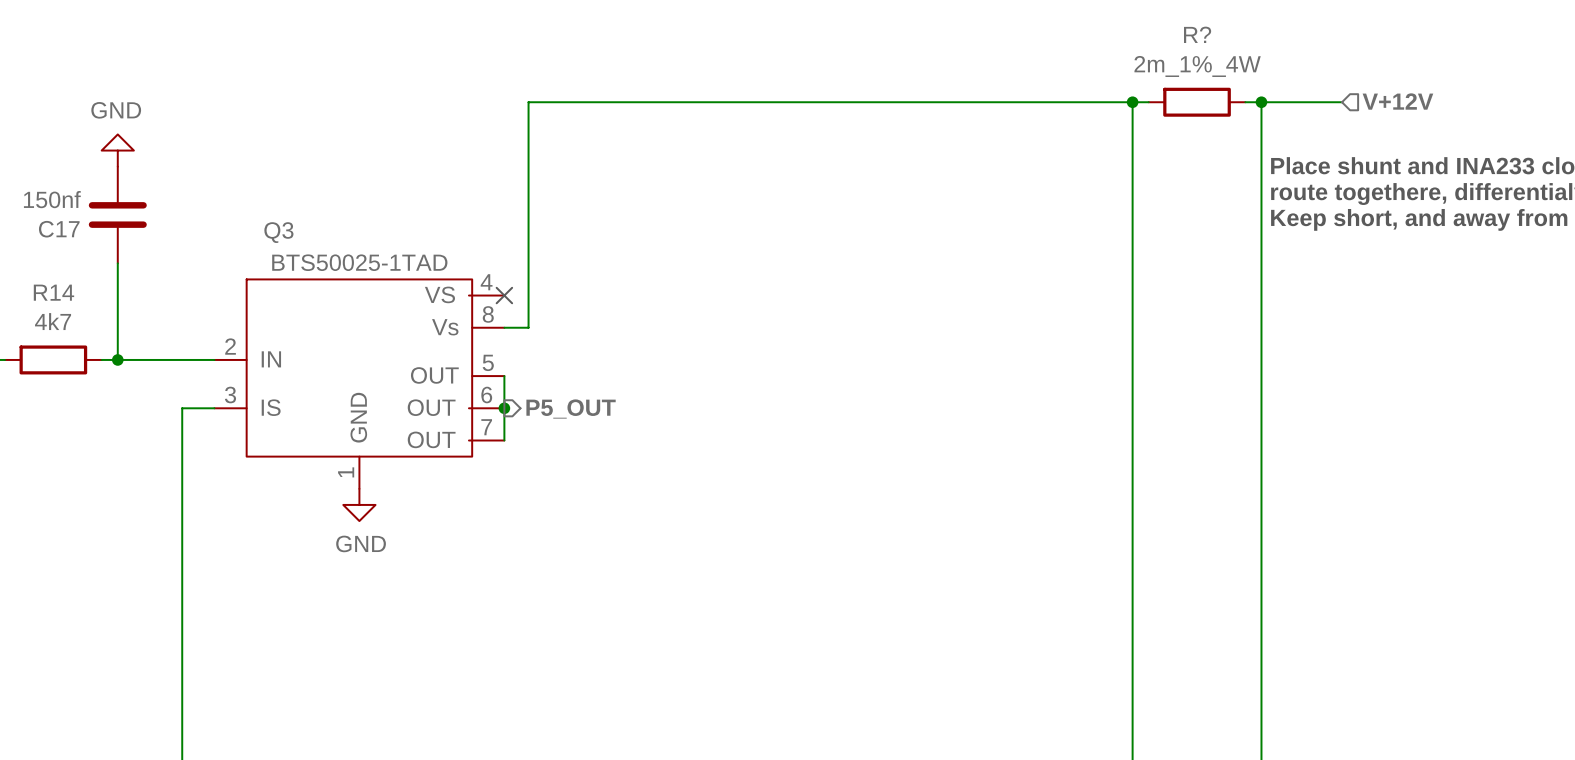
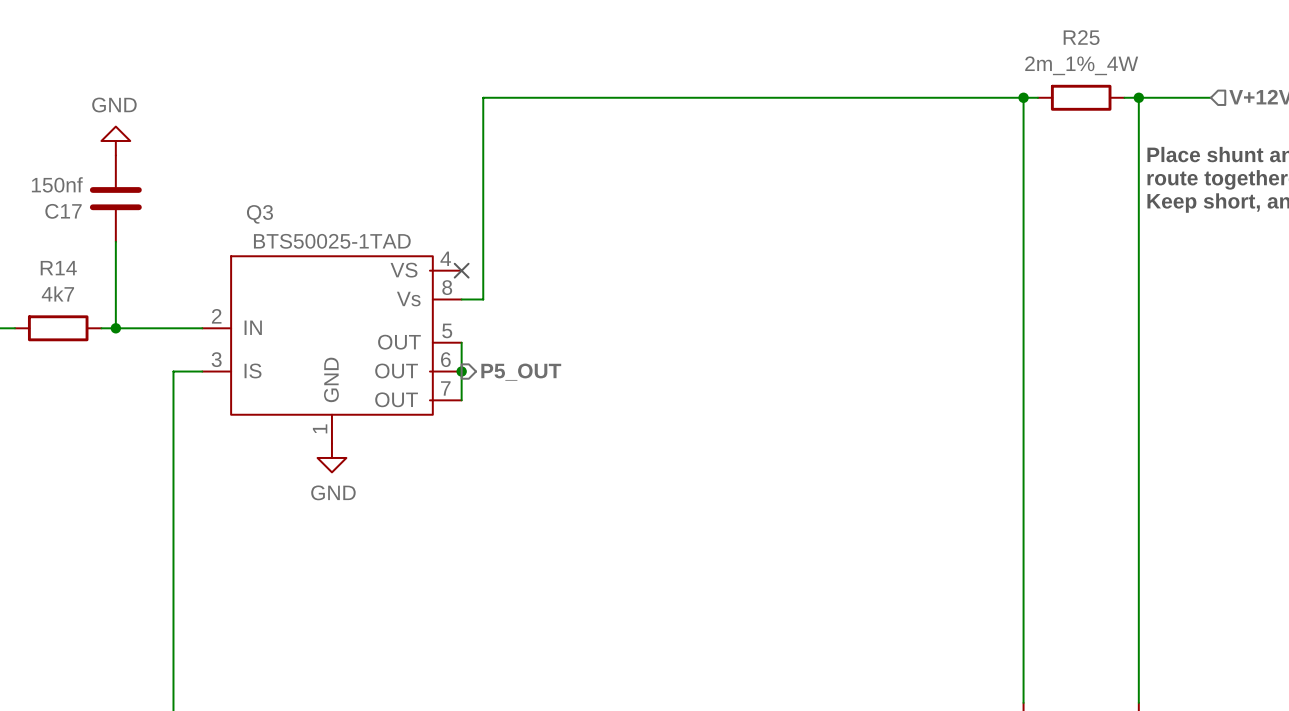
R? name: R? (1197, 34) -> R25 (1081, 37)

